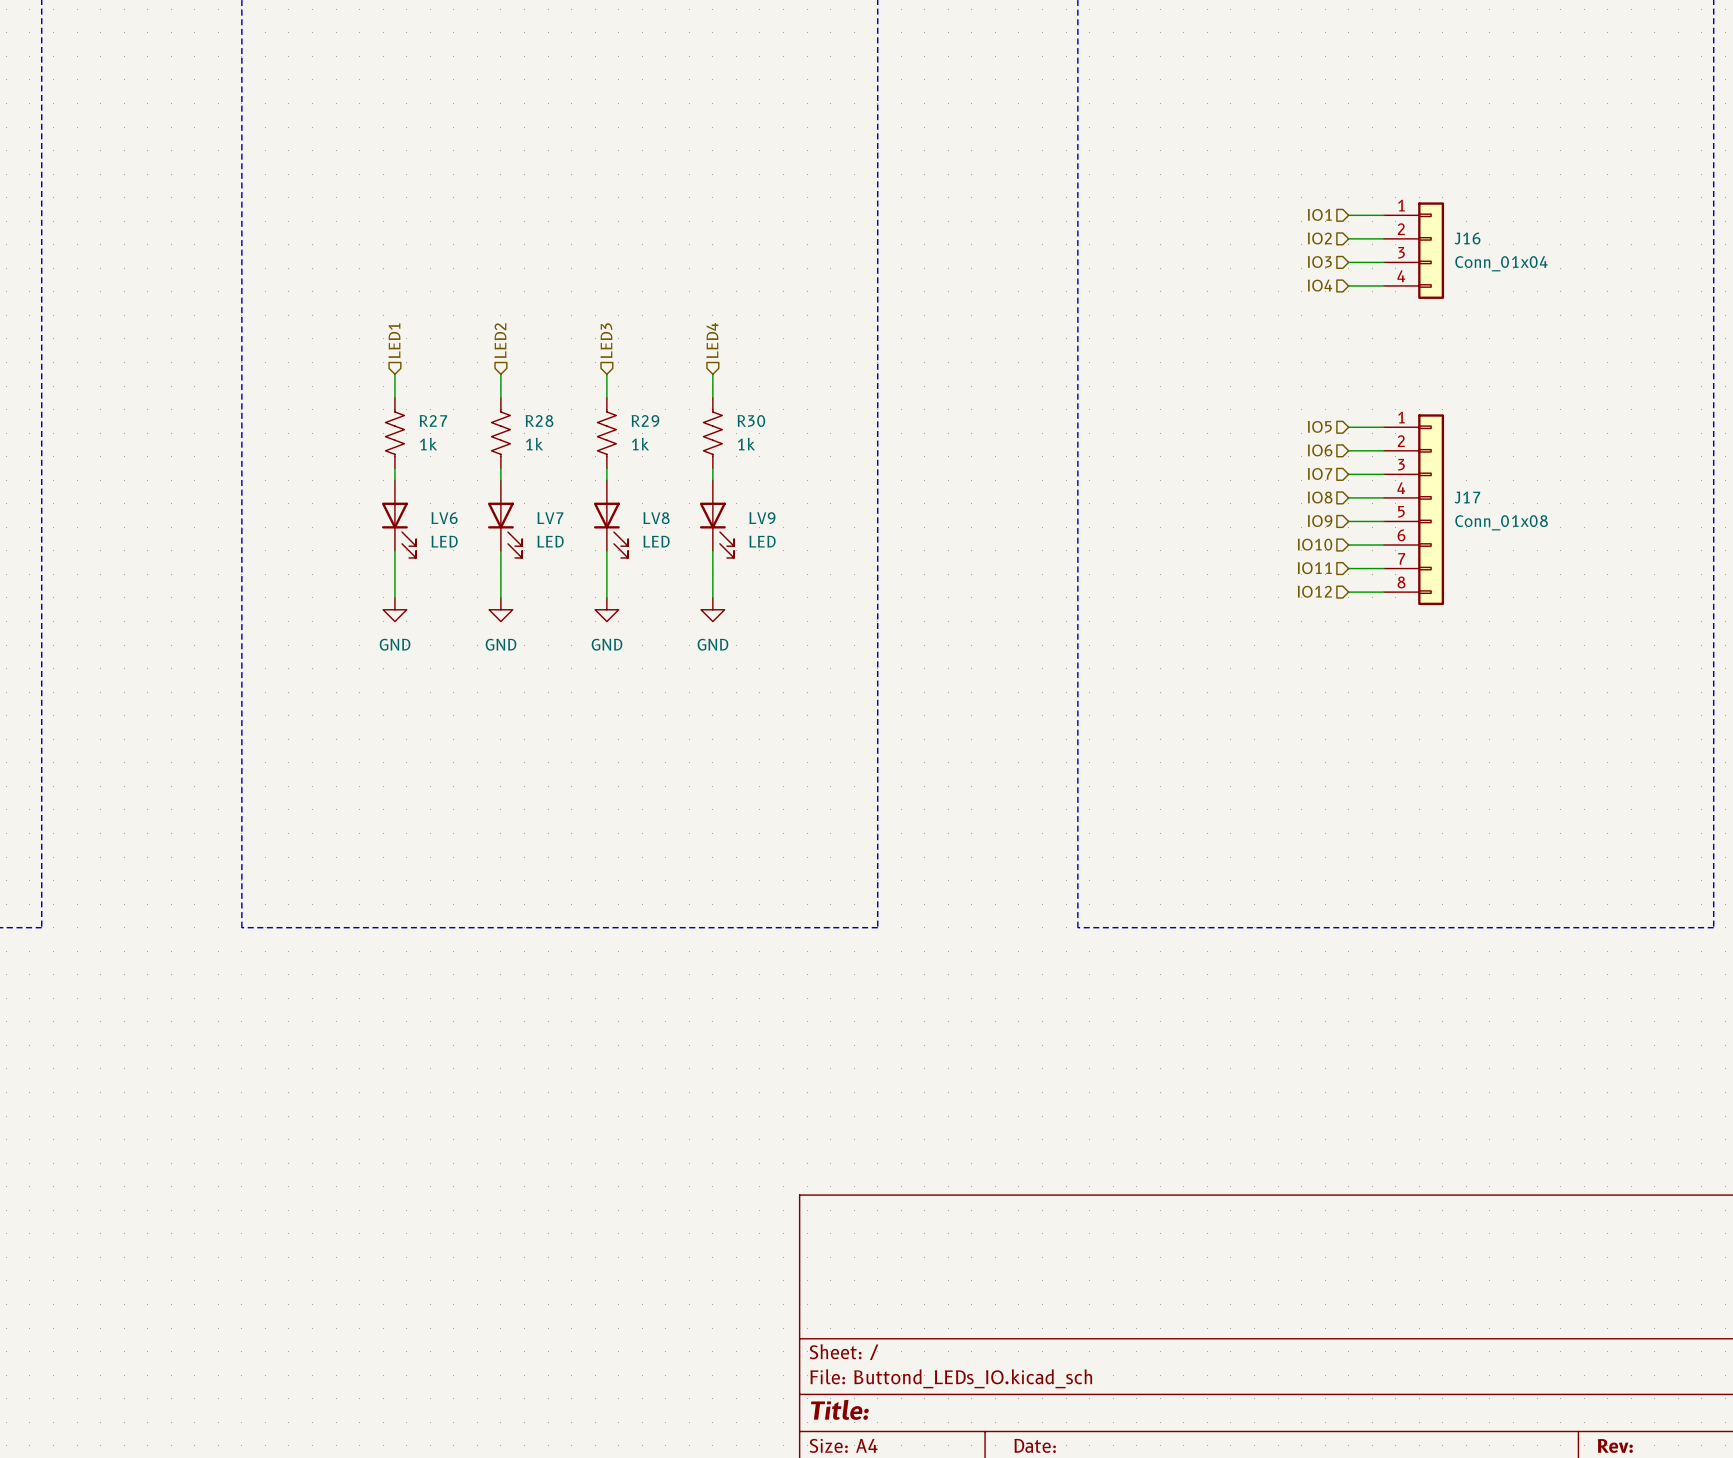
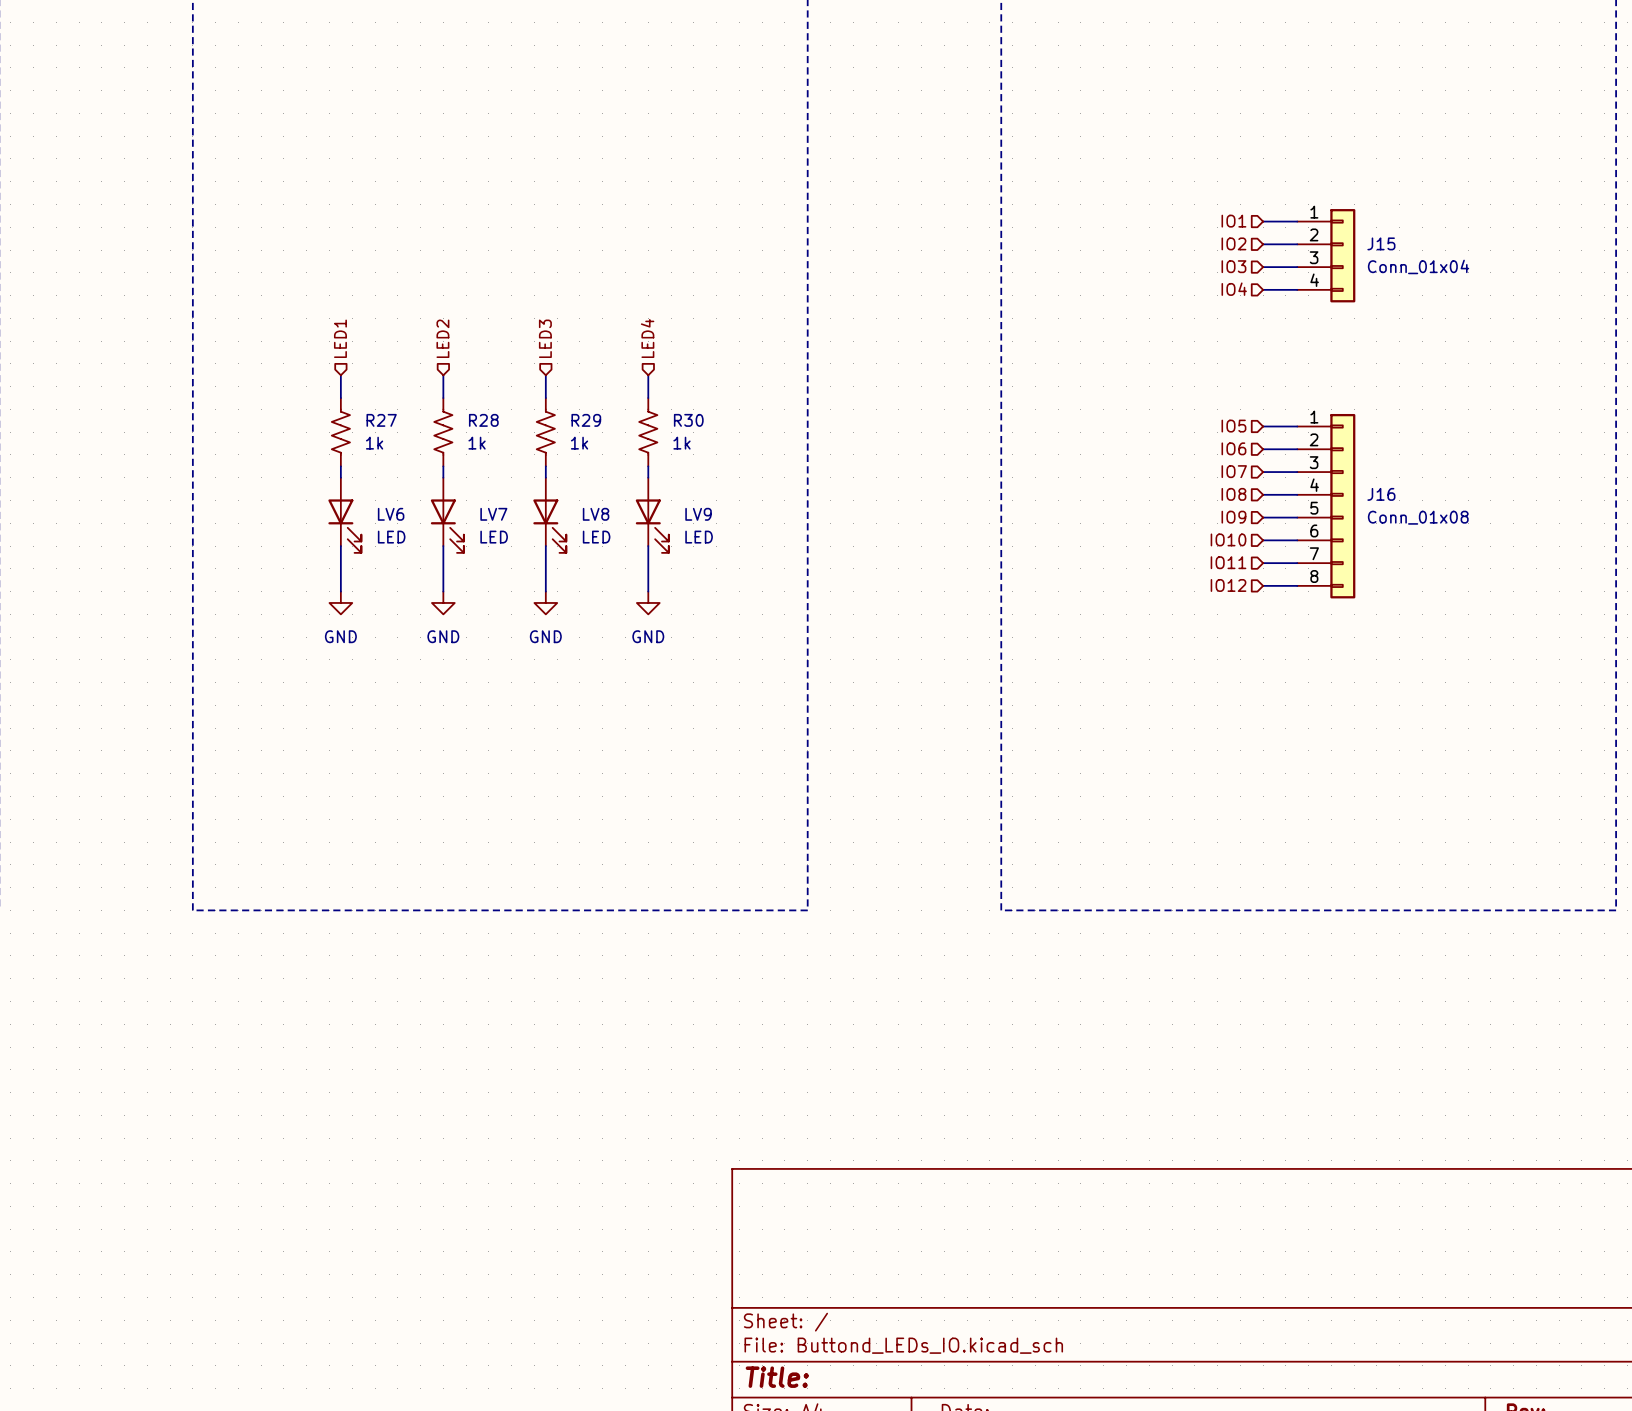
J16 name: J16 (1467, 238) -> J15 (1381, 243)
J17 name: J17 (1467, 497) -> J16 (1381, 494)

